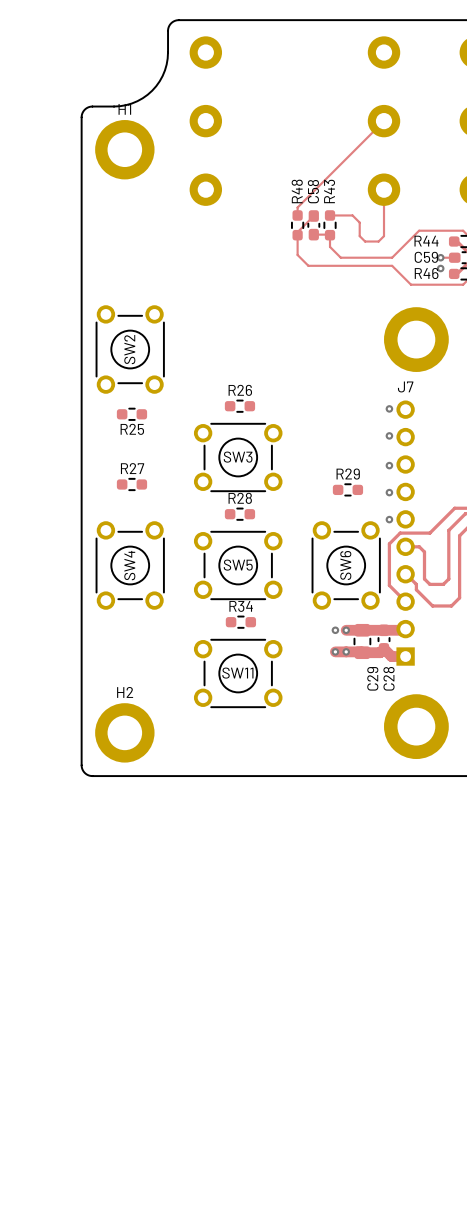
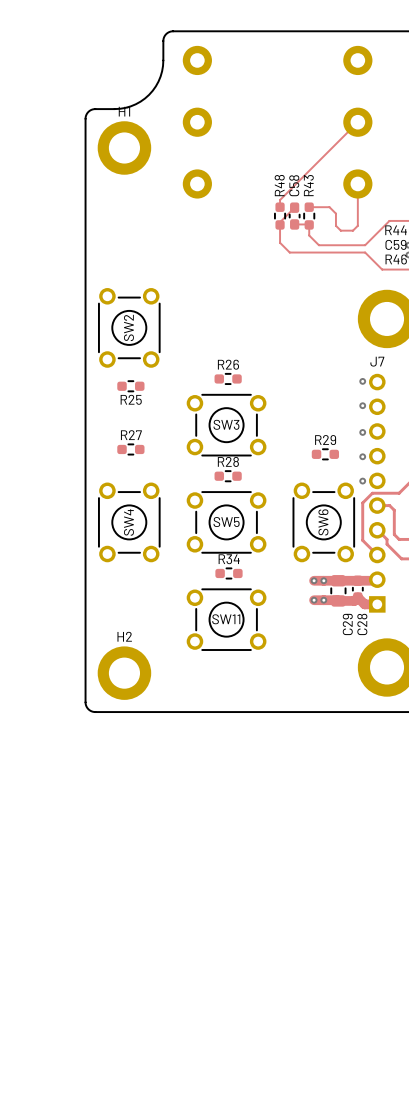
track: none -> (314, 580) (323, 580)

